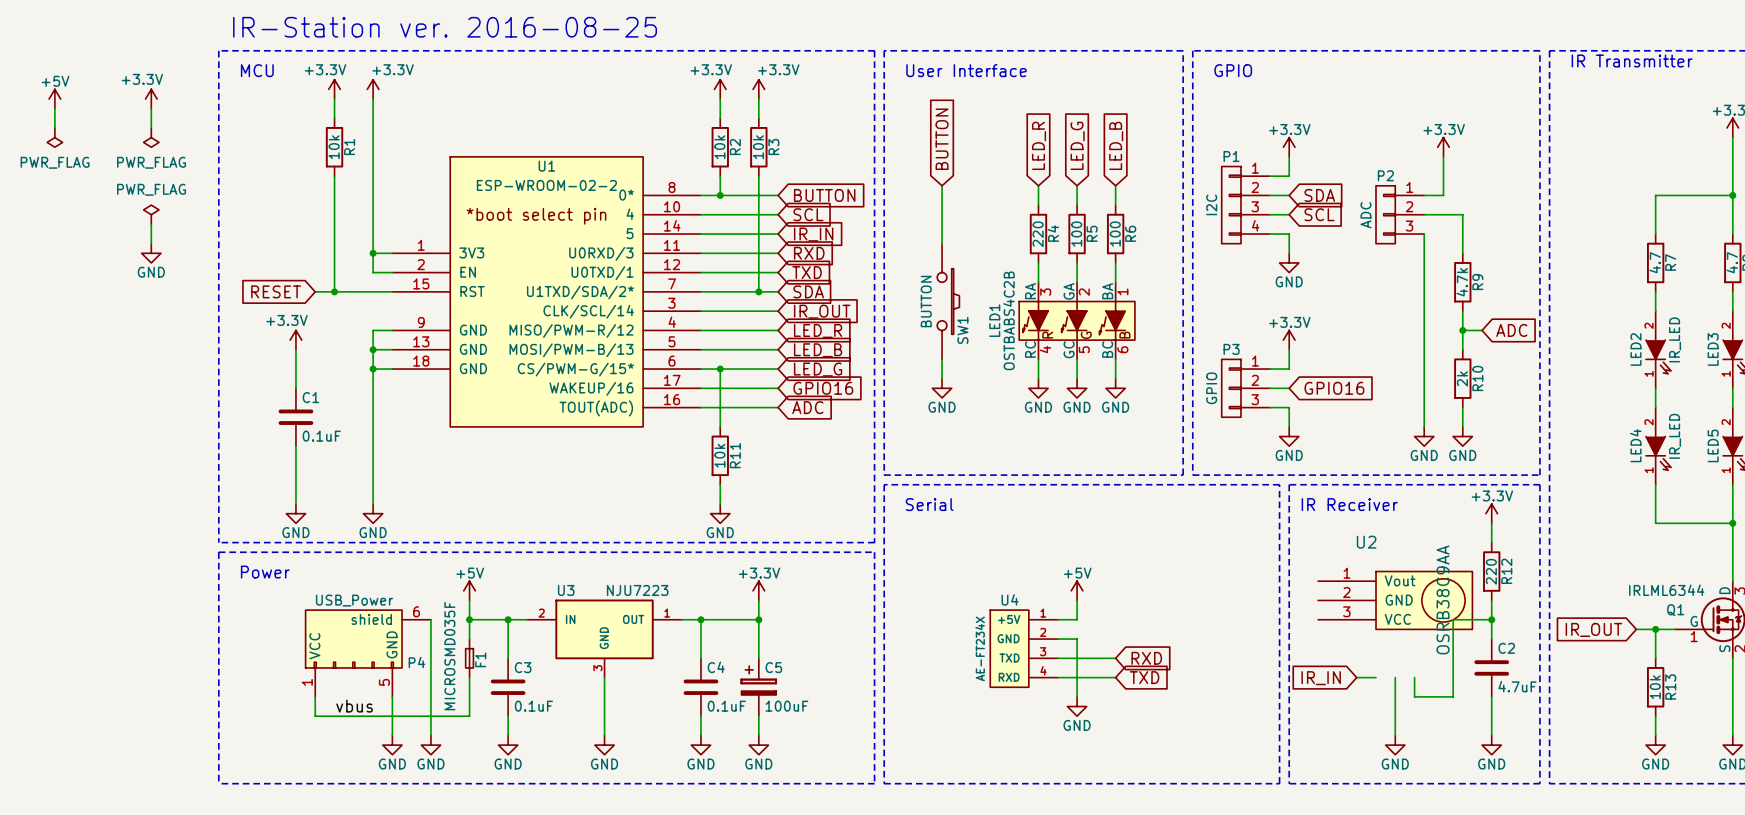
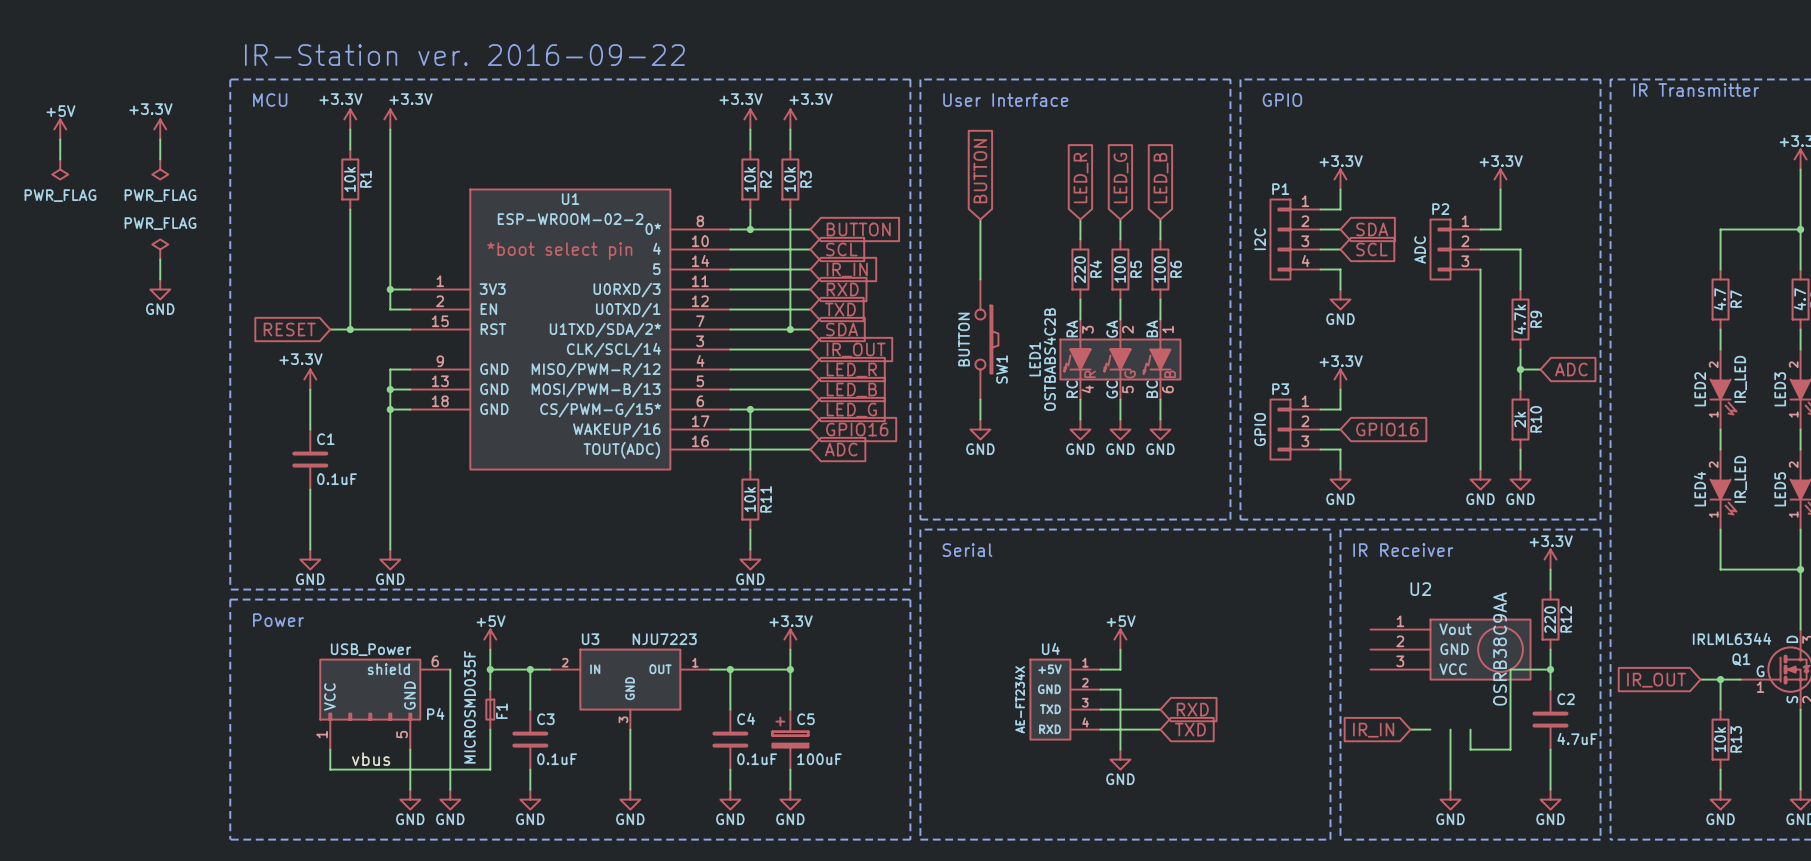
text: IR-Station ver. 2016-08-25 (445, 27) -> IR-Station ver. 2016-09-22 (464, 55)

